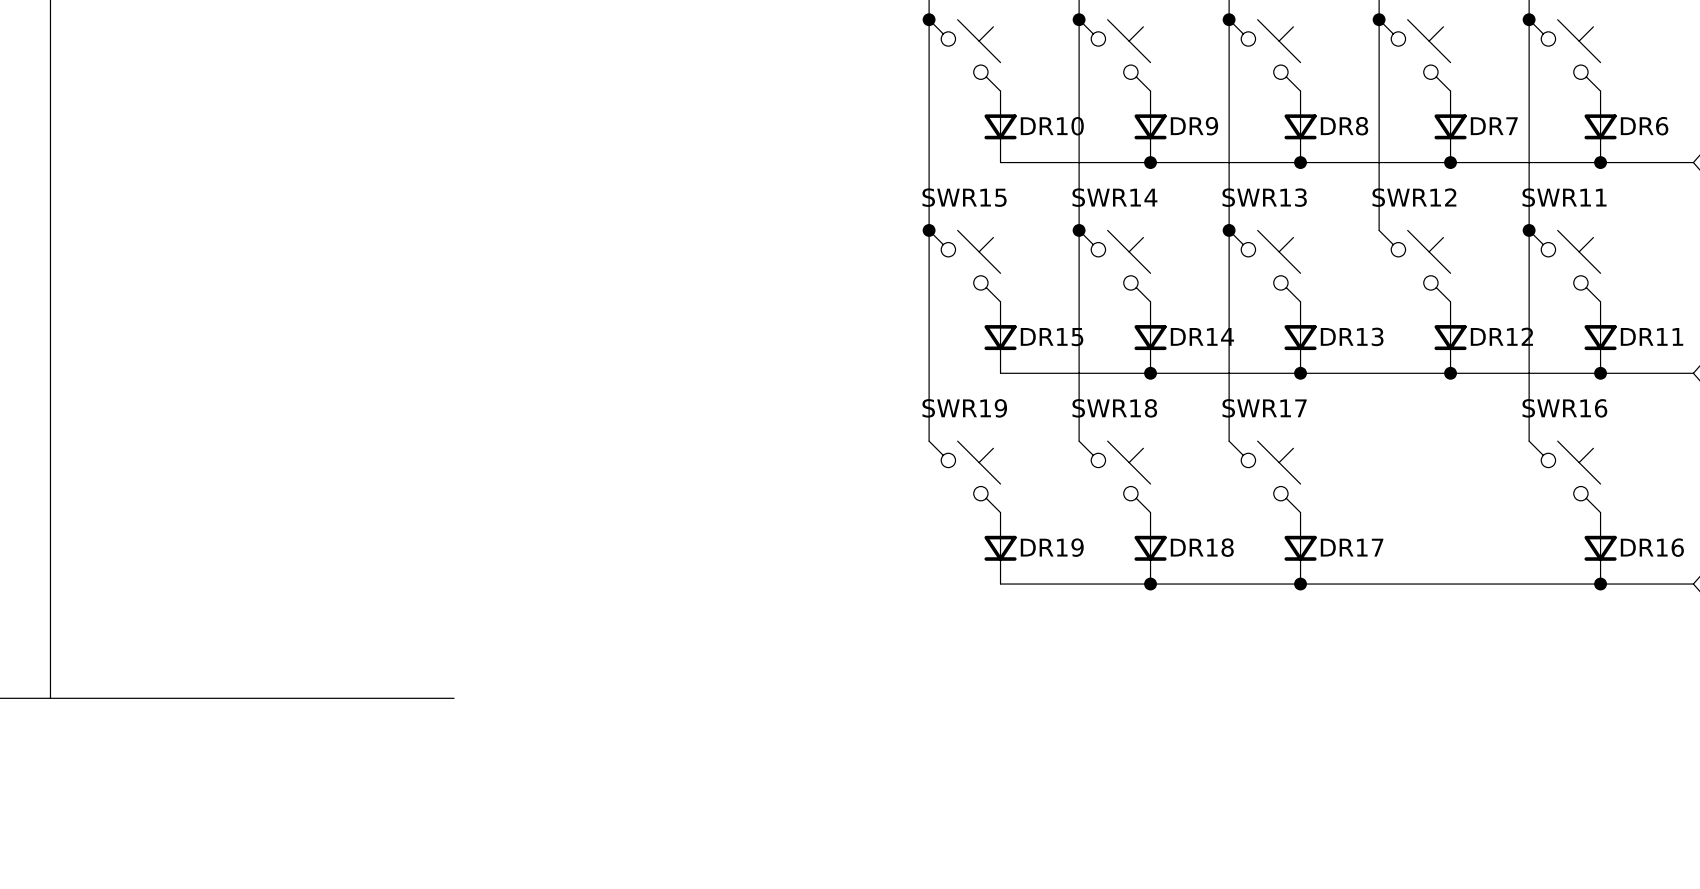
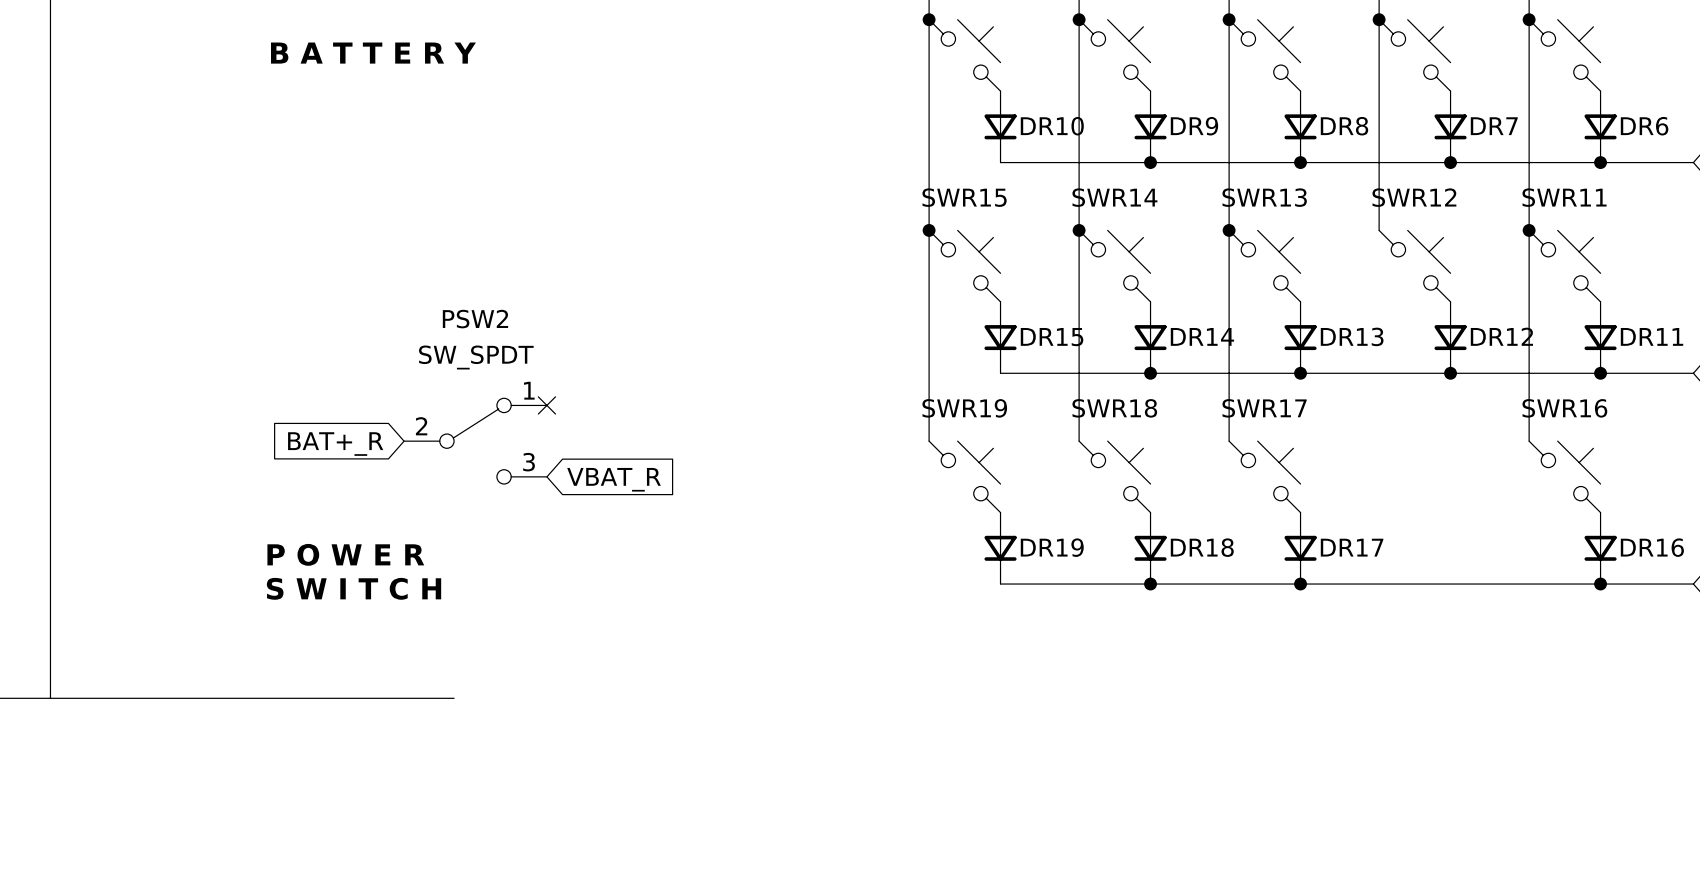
text: none -> B A T T E R Y (373, 53)
no-connect mark: none -> (546, 405)
PSW2: none -> SW_SPDT (475, 441)
global label: none -> BAT+_R (335, 444)
global label: none -> VBAT_R (614, 479)
text: none -> P O W E R (345, 554)
text: none -> S W I T C H (354, 588)

